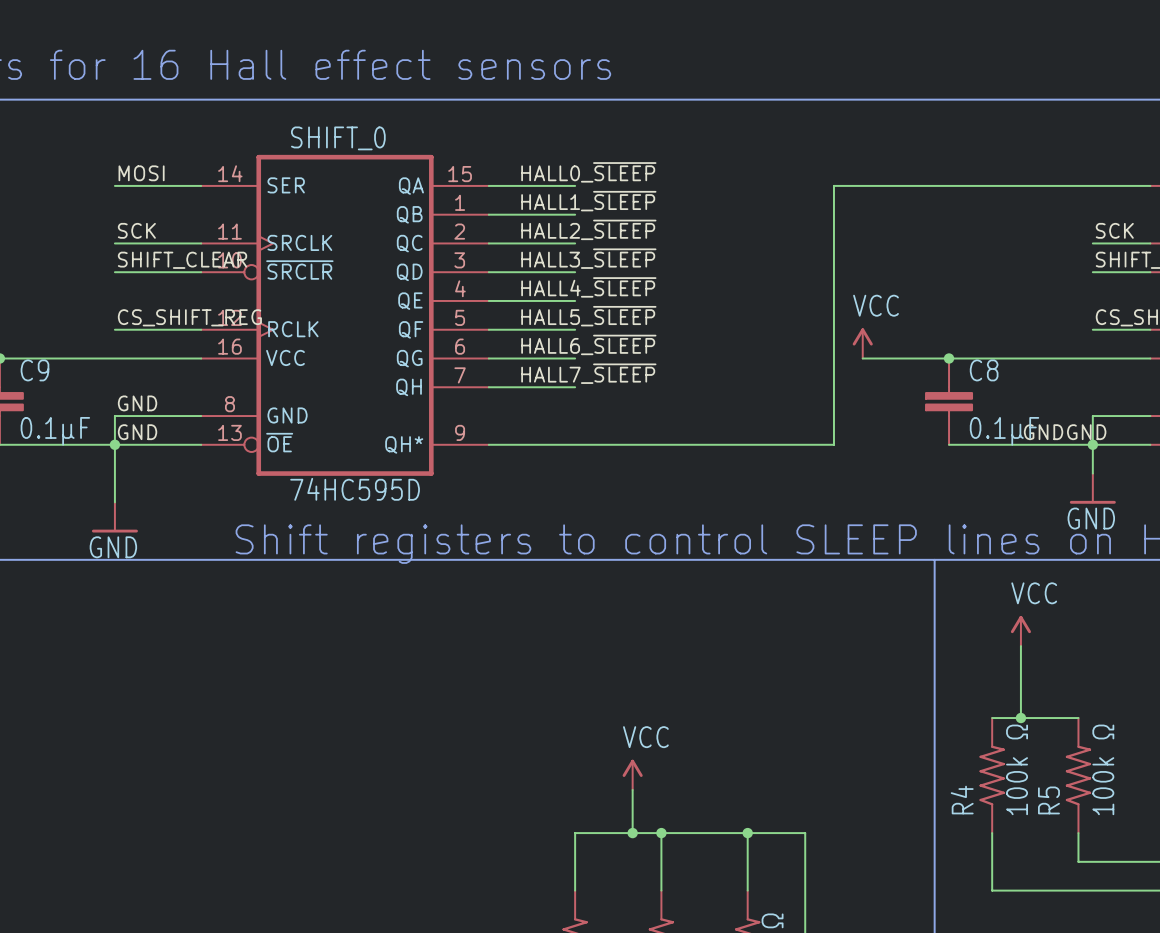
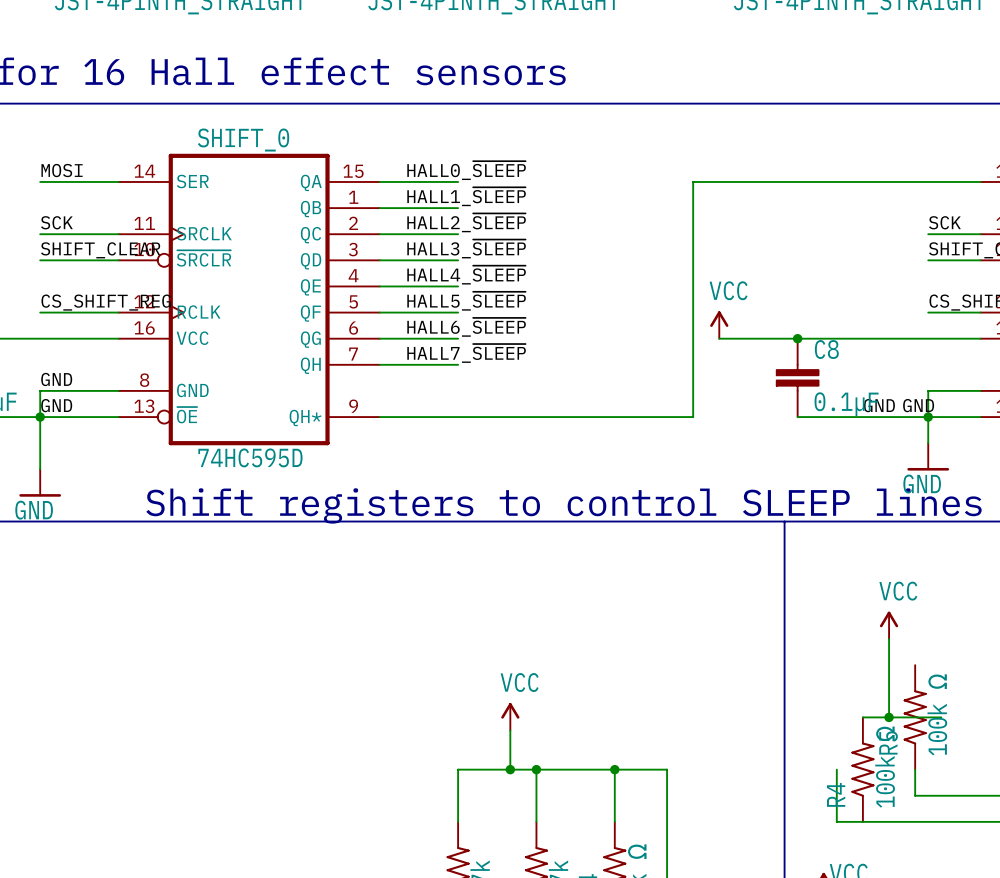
power symbol position: VCC (1020, 631) -> VCC (889, 625)
wire: (1020, 646) (1020, 718) -> none
wire: none -> (889, 639) (889, 717)
wire: (992, 718) (1078, 718) -> (862, 717) (941, 717)
junction position: (1020, 718) -> (889, 717)
R4 position: (992, 775) -> (862, 769)

